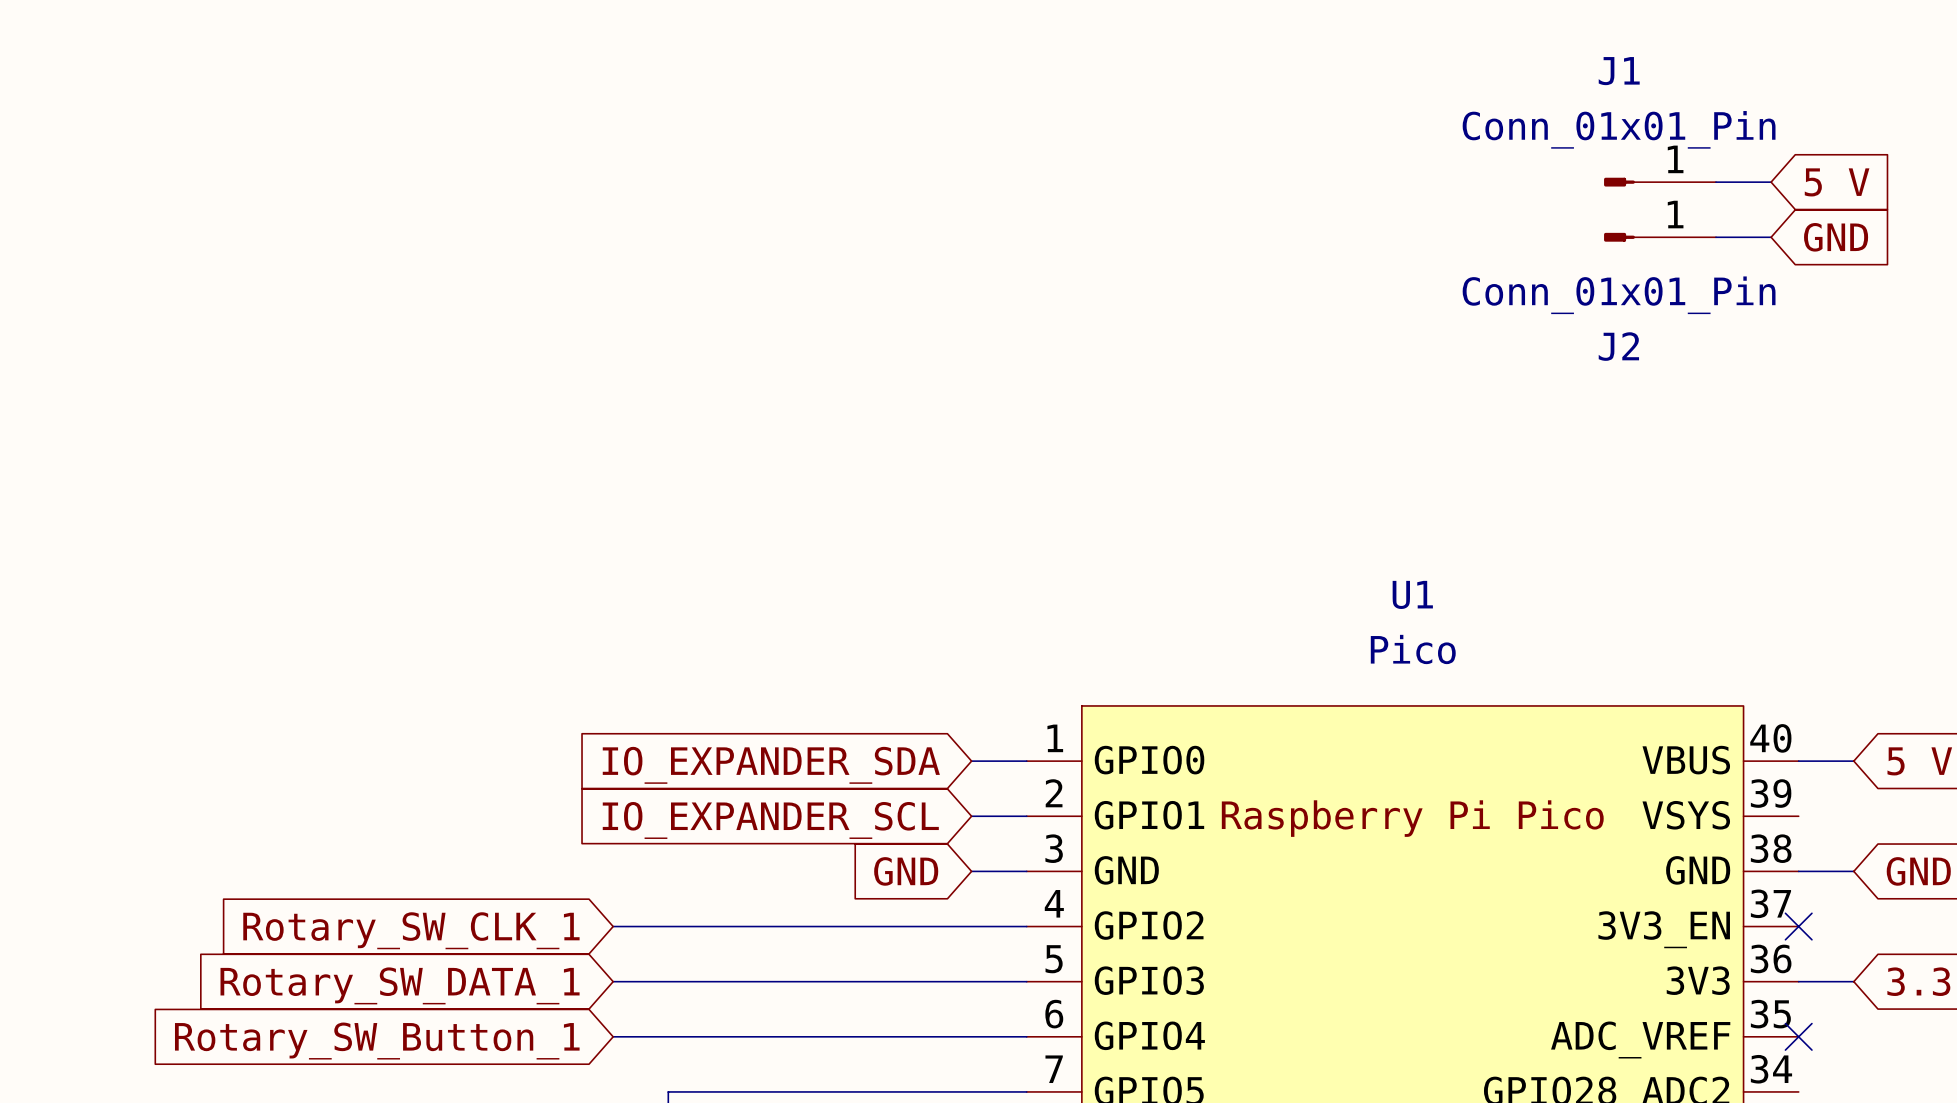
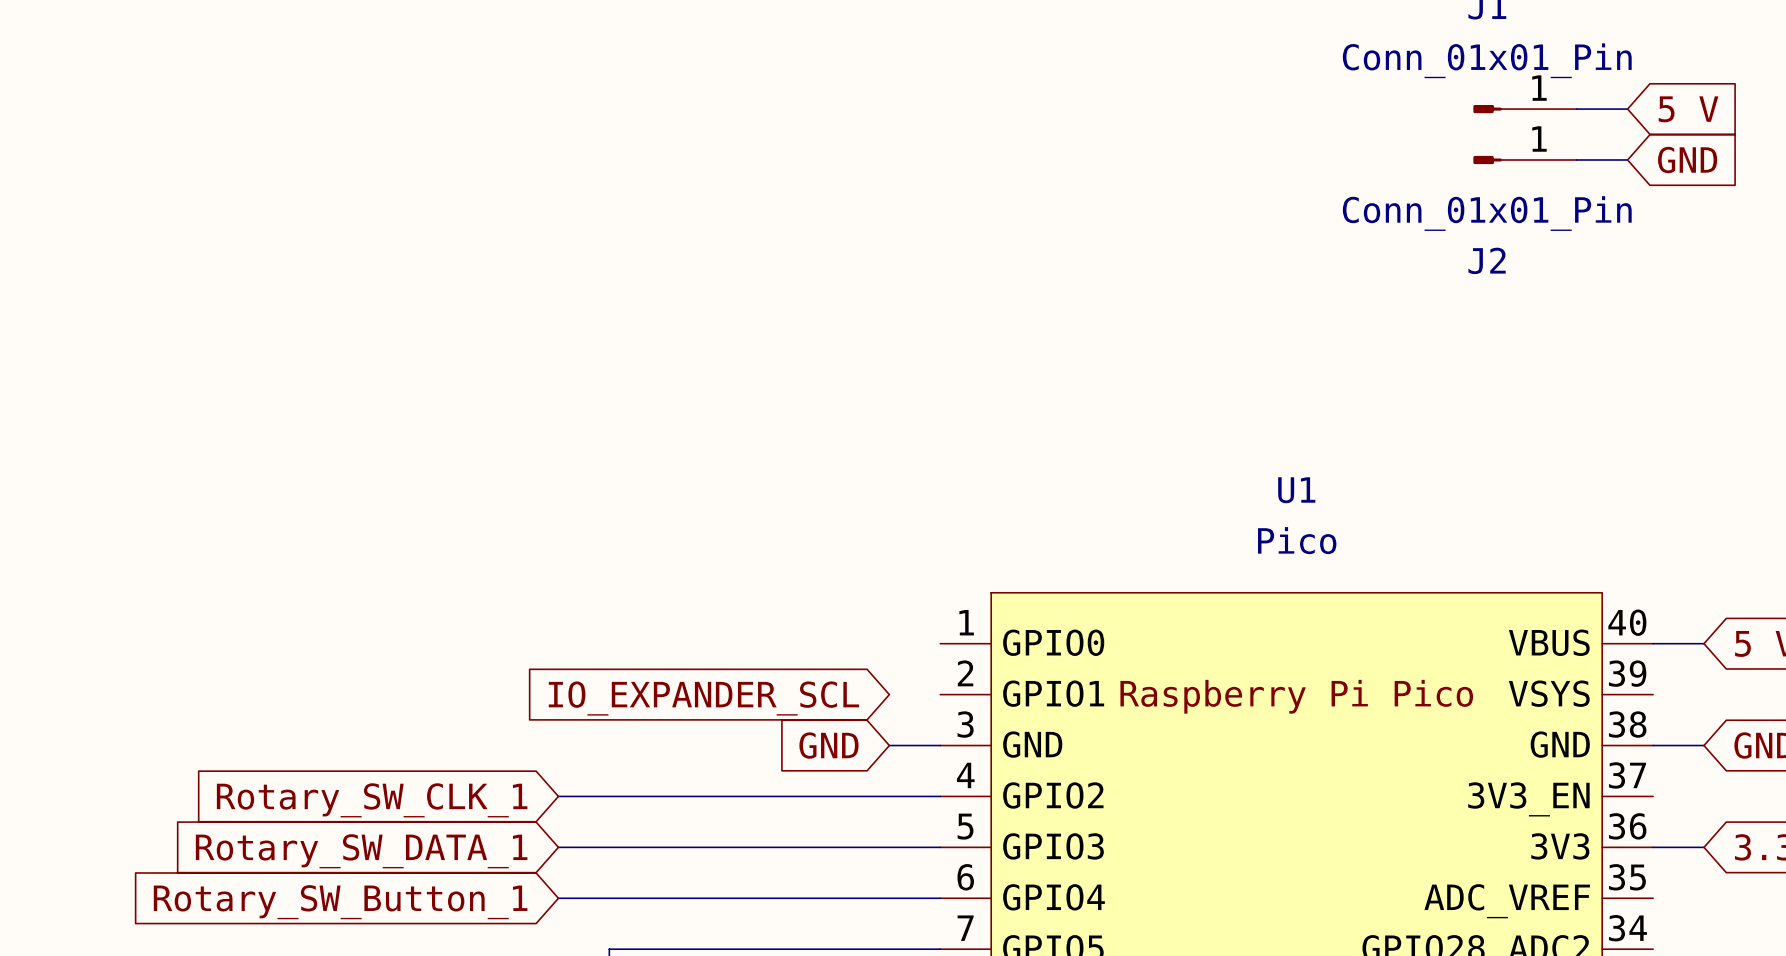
wire: (971, 761) (1026, 761) -> none
global label: IO_EXPANDER_SDA (771, 765) -> none
wire: (971, 816) (1026, 816) -> none
no-connect mark: (1798, 926) -> none
no-connect mark: (1798, 1036) -> none

